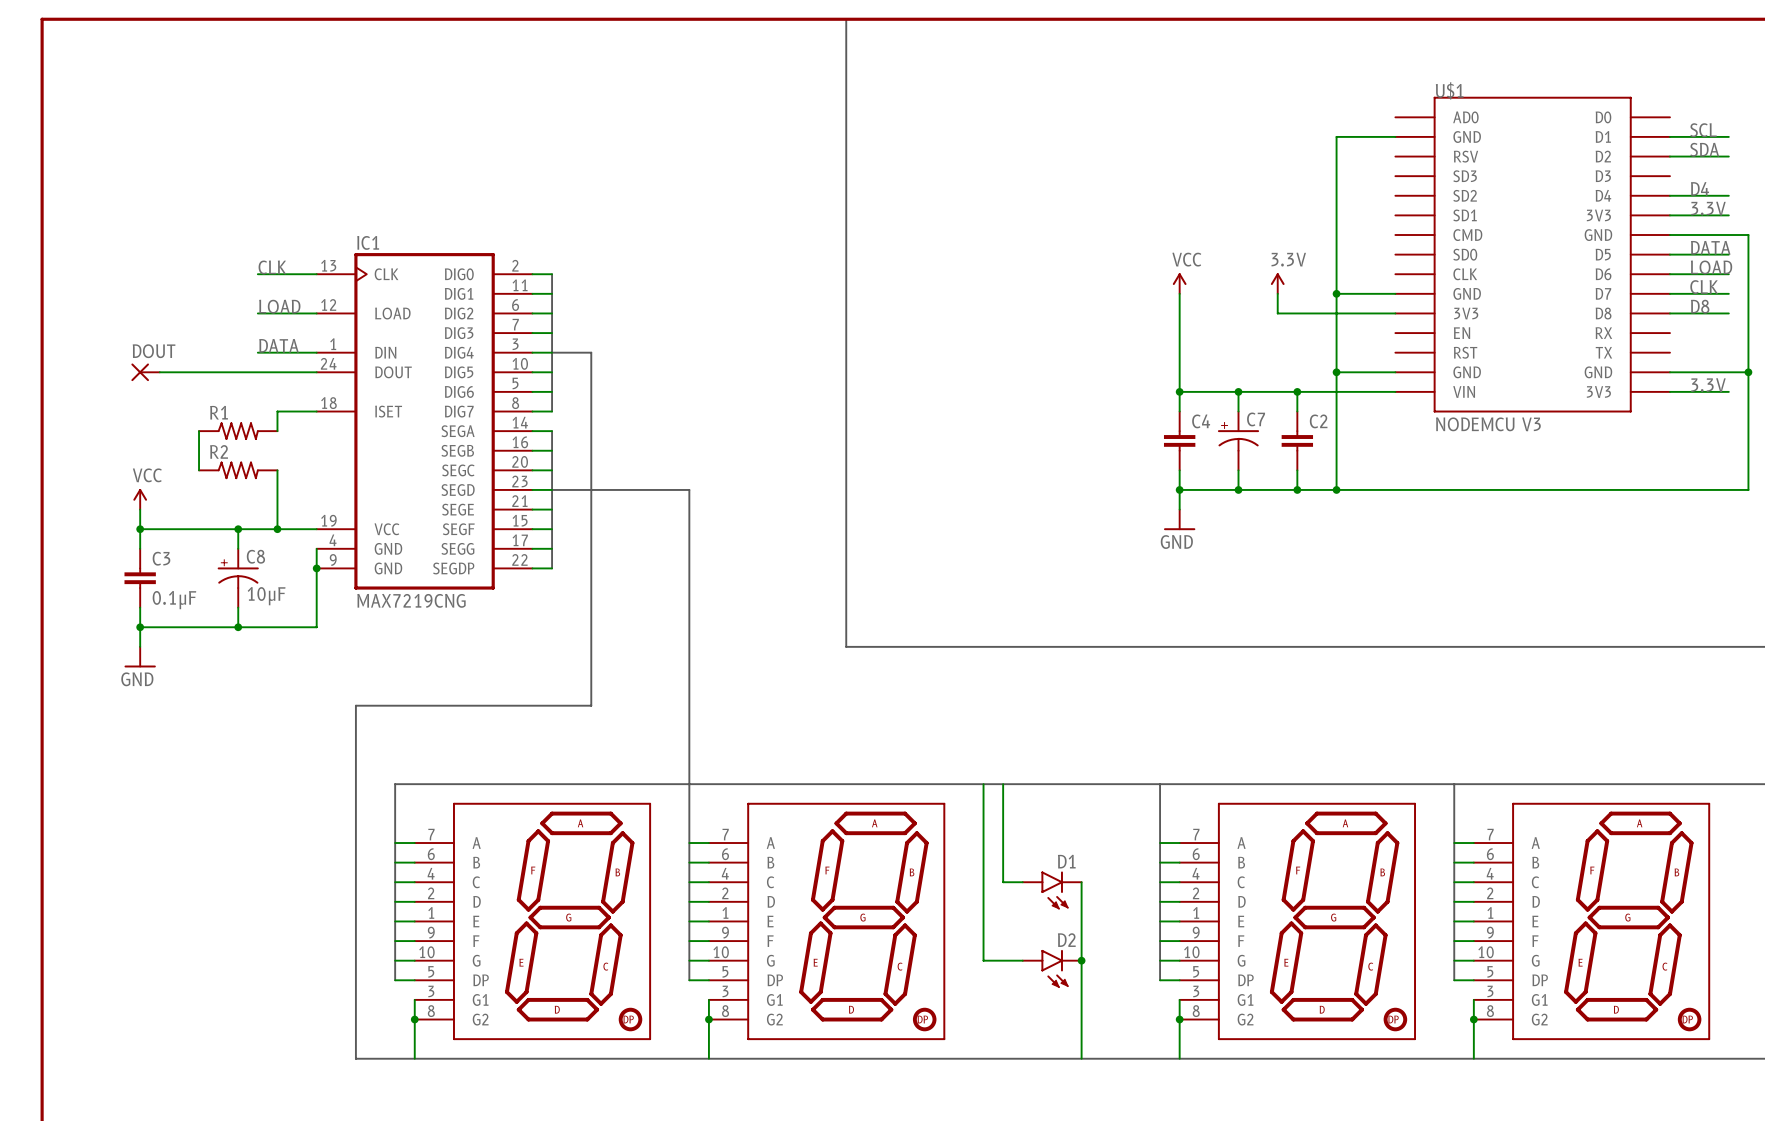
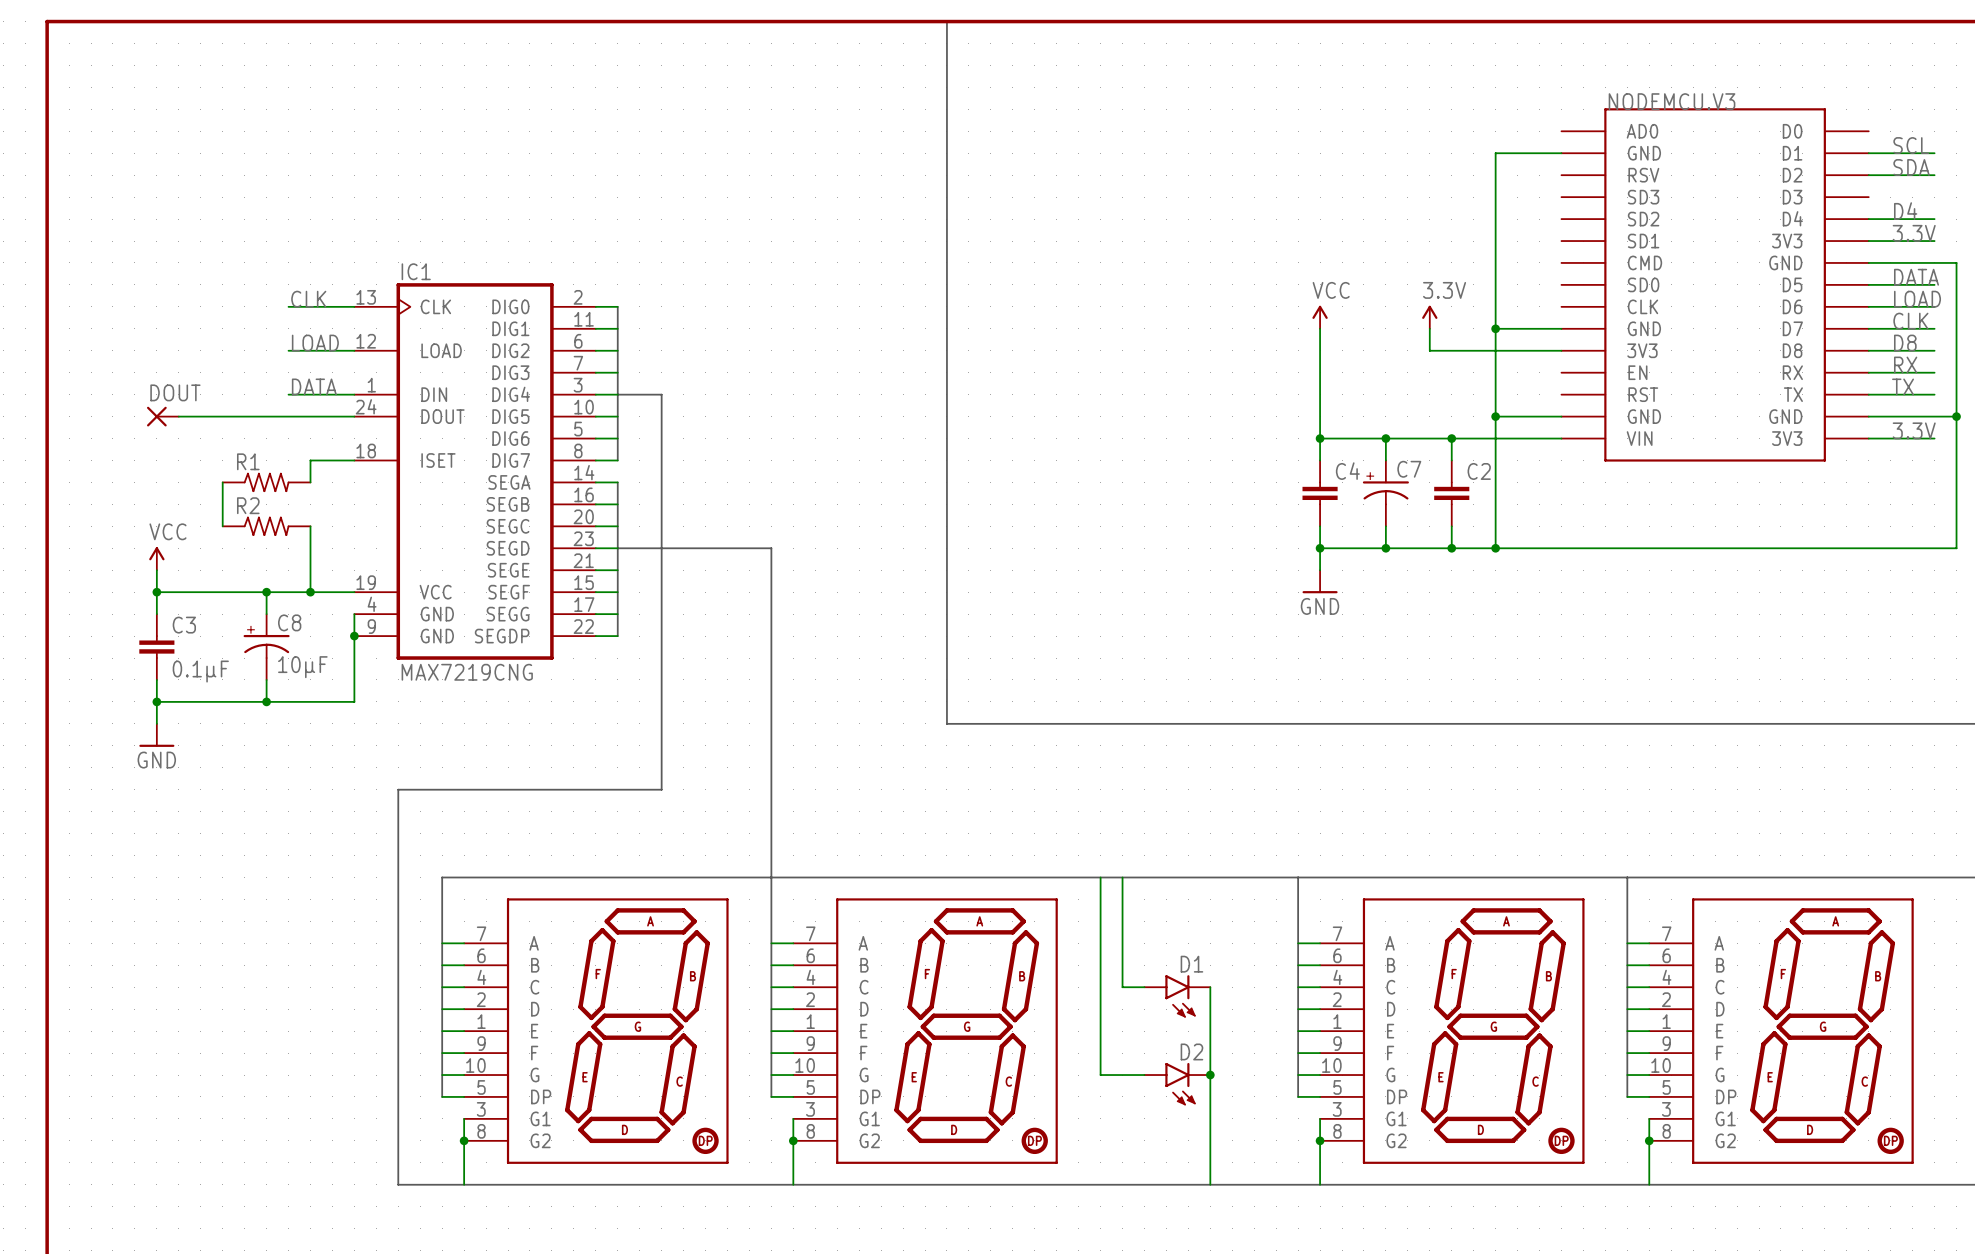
U$1 name: U$1 (1449, 90) -> NODEMCU.V3 (1672, 101)
label: none -> RX (1905, 365)
wire: none -> (1868, 372) (1934, 372)
label: none -> TX (1903, 386)
wire: none -> (1868, 394) (1934, 394)
U$1 value: NODEMCU V3 (1488, 424) -> none

